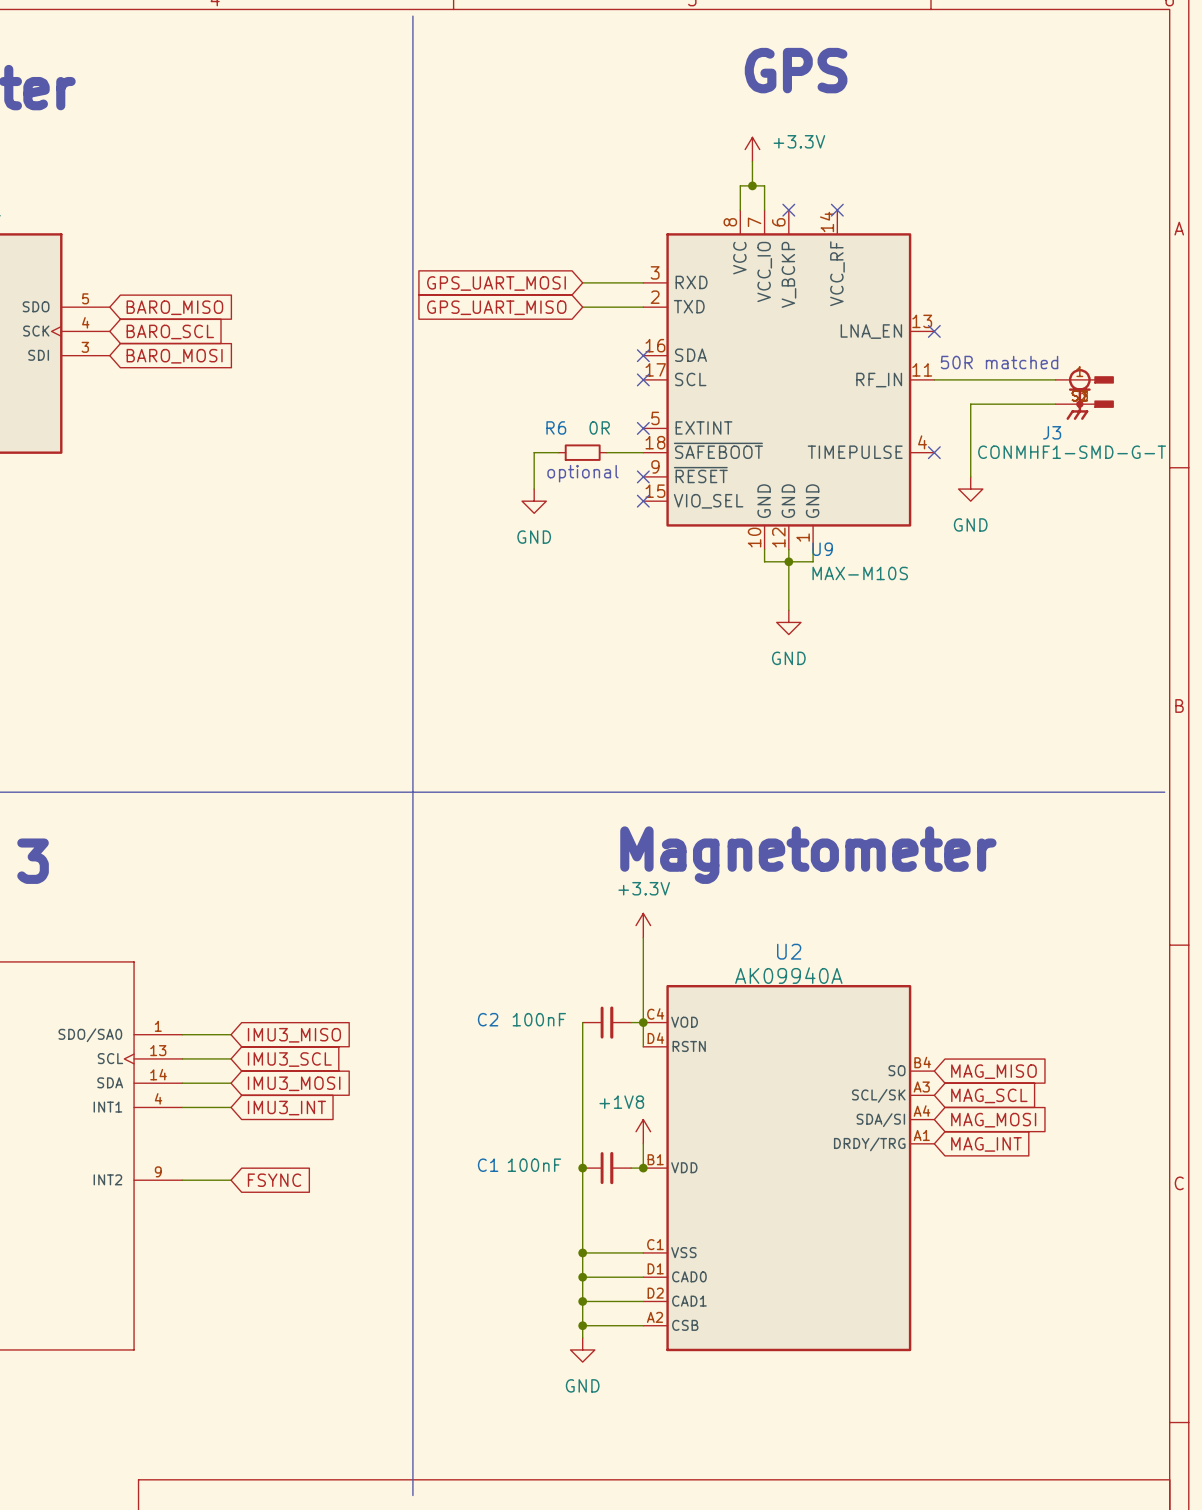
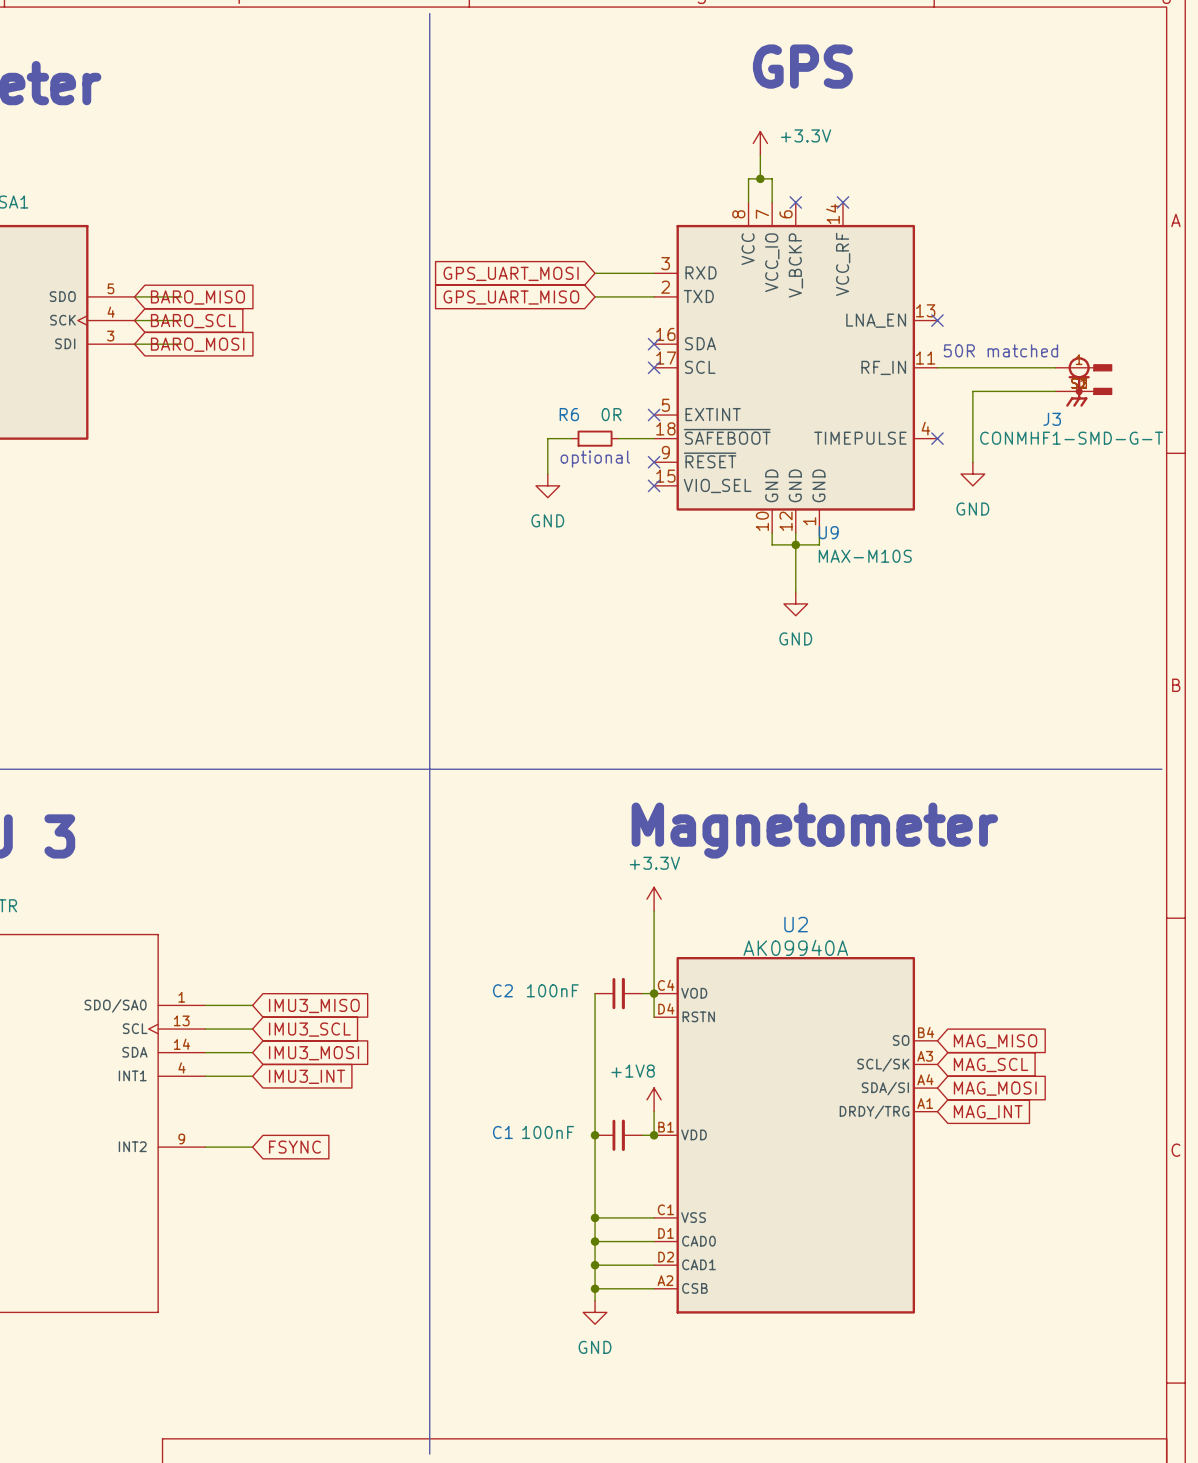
wire: none -> (134, 296) (181, 296)
wire: none -> (134, 320) (181, 320)
wire: none -> (134, 344) (181, 344)

